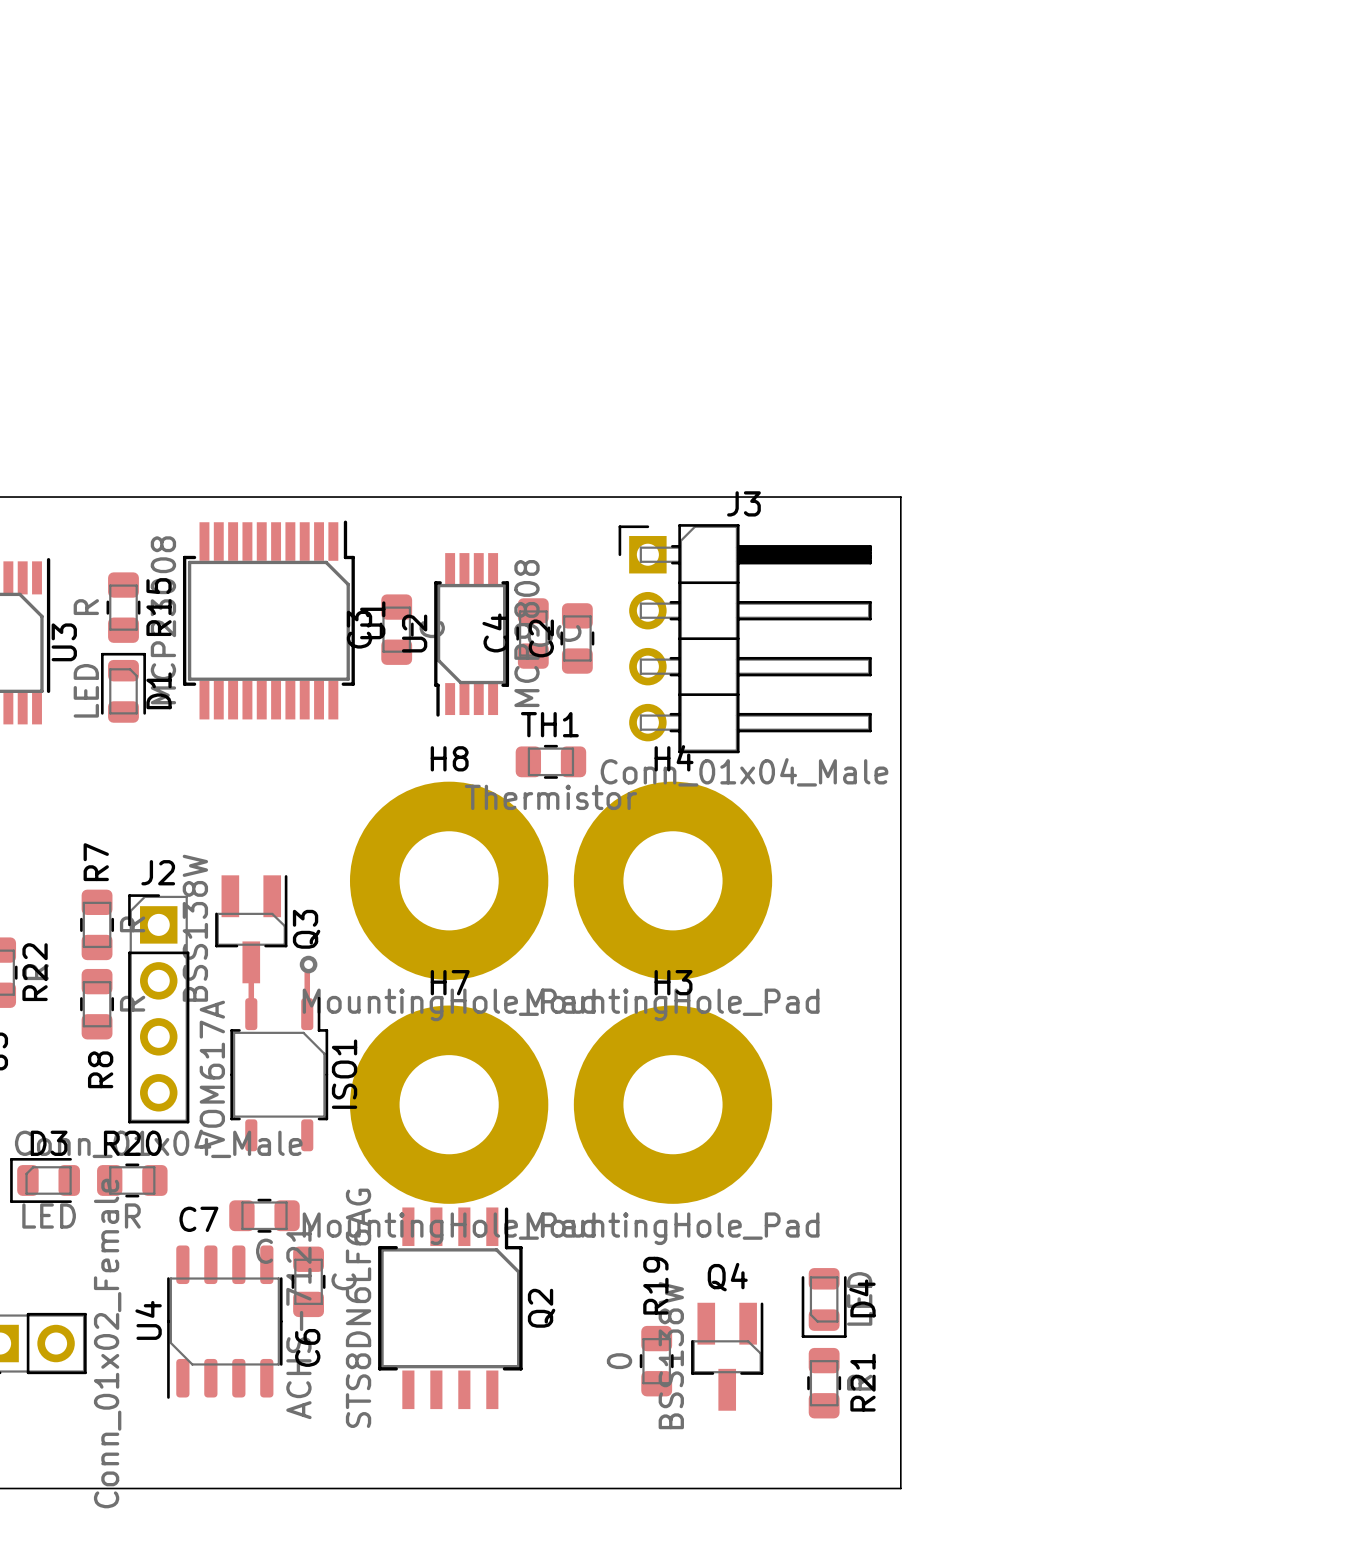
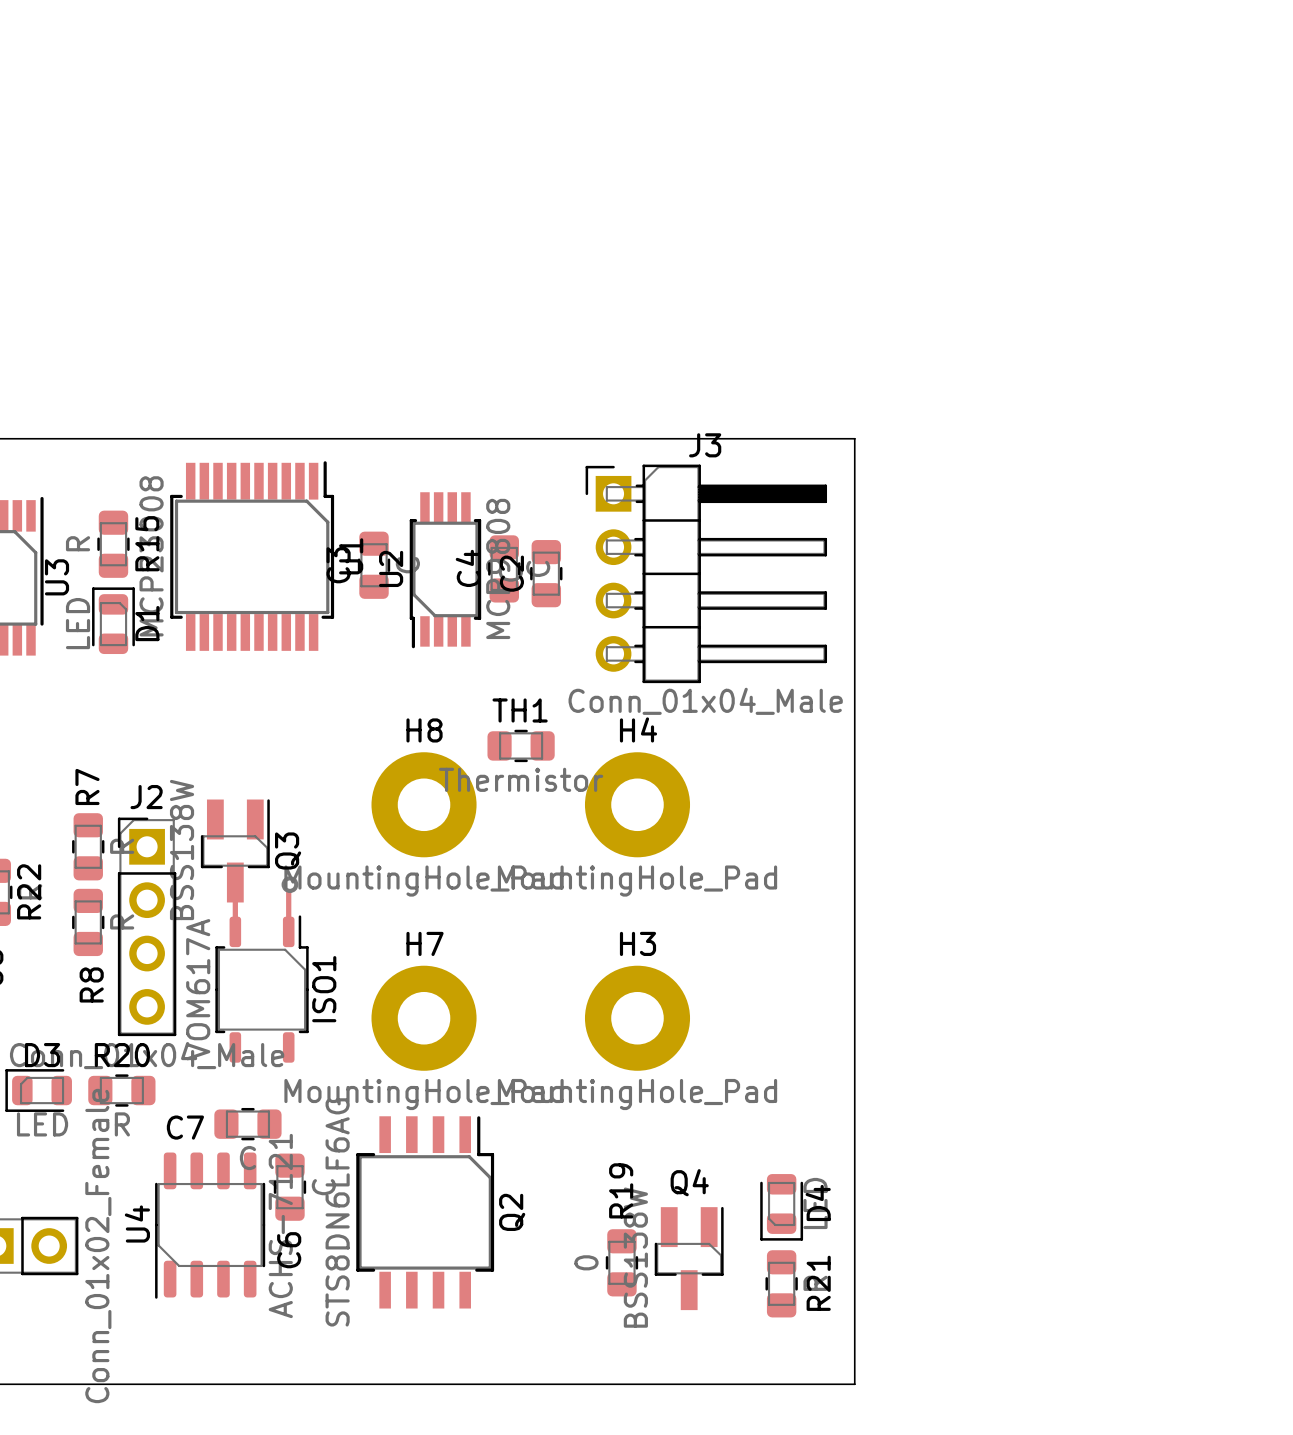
TH1 position: (550, 761) -> (521, 745)
H8 footprint: [349, 781, 549, 980] -> [371, 752, 477, 858]
H4 footprint: [573, 781, 773, 980] -> [584, 752, 691, 858]
H7 footprint: [349, 1005, 549, 1204] -> [371, 965, 477, 1071]
H3 footprint: [573, 1005, 773, 1204] -> [584, 965, 691, 1071]

